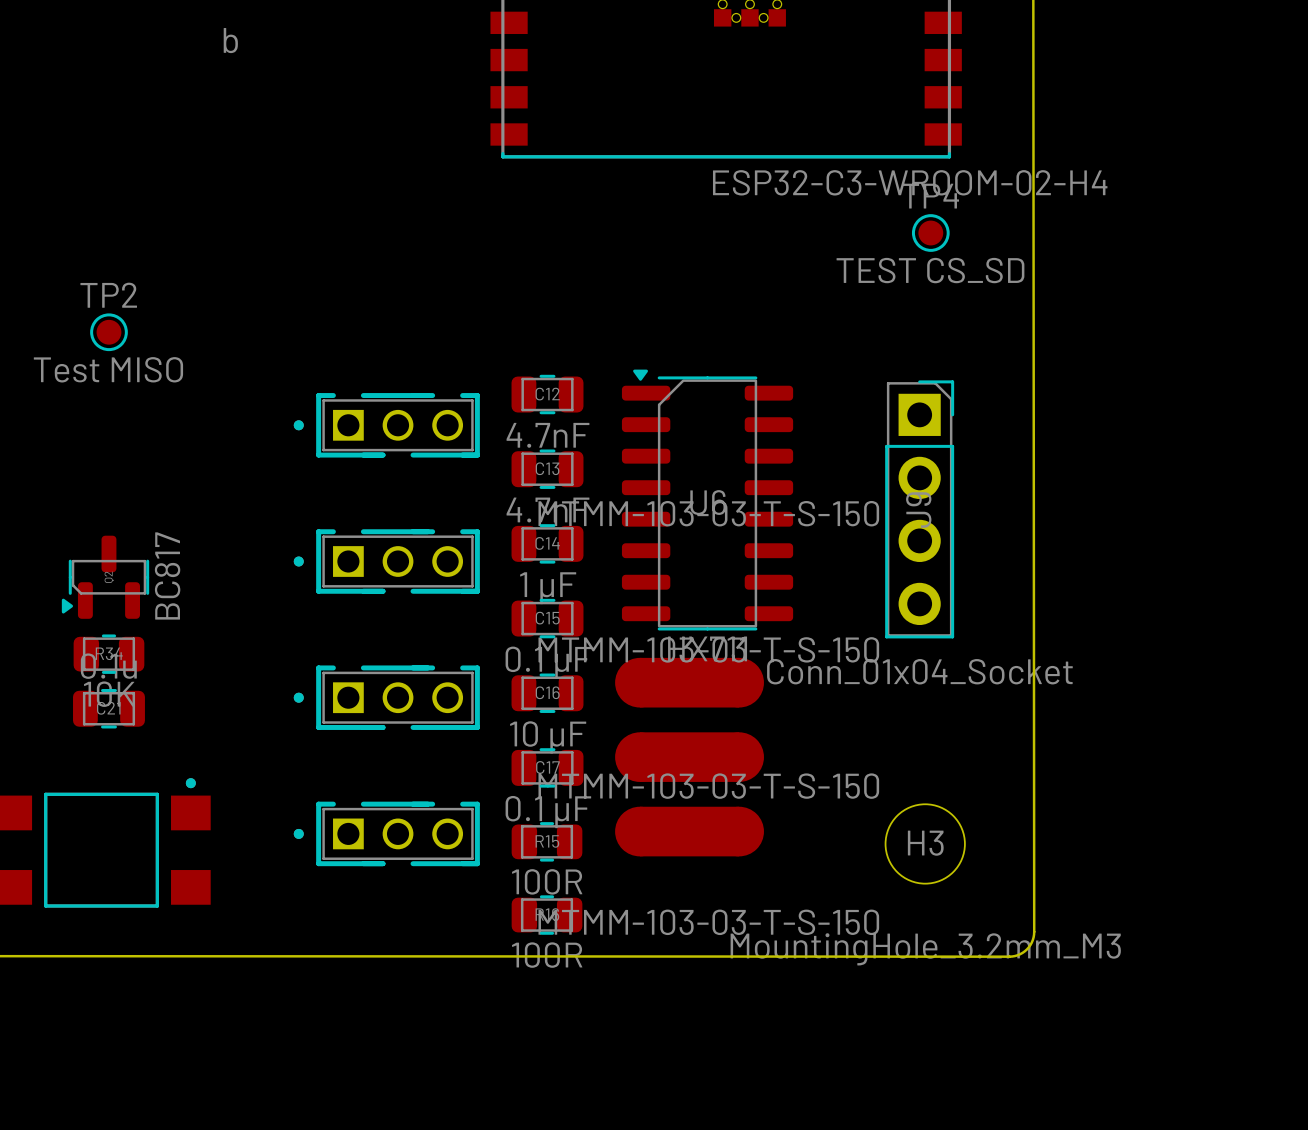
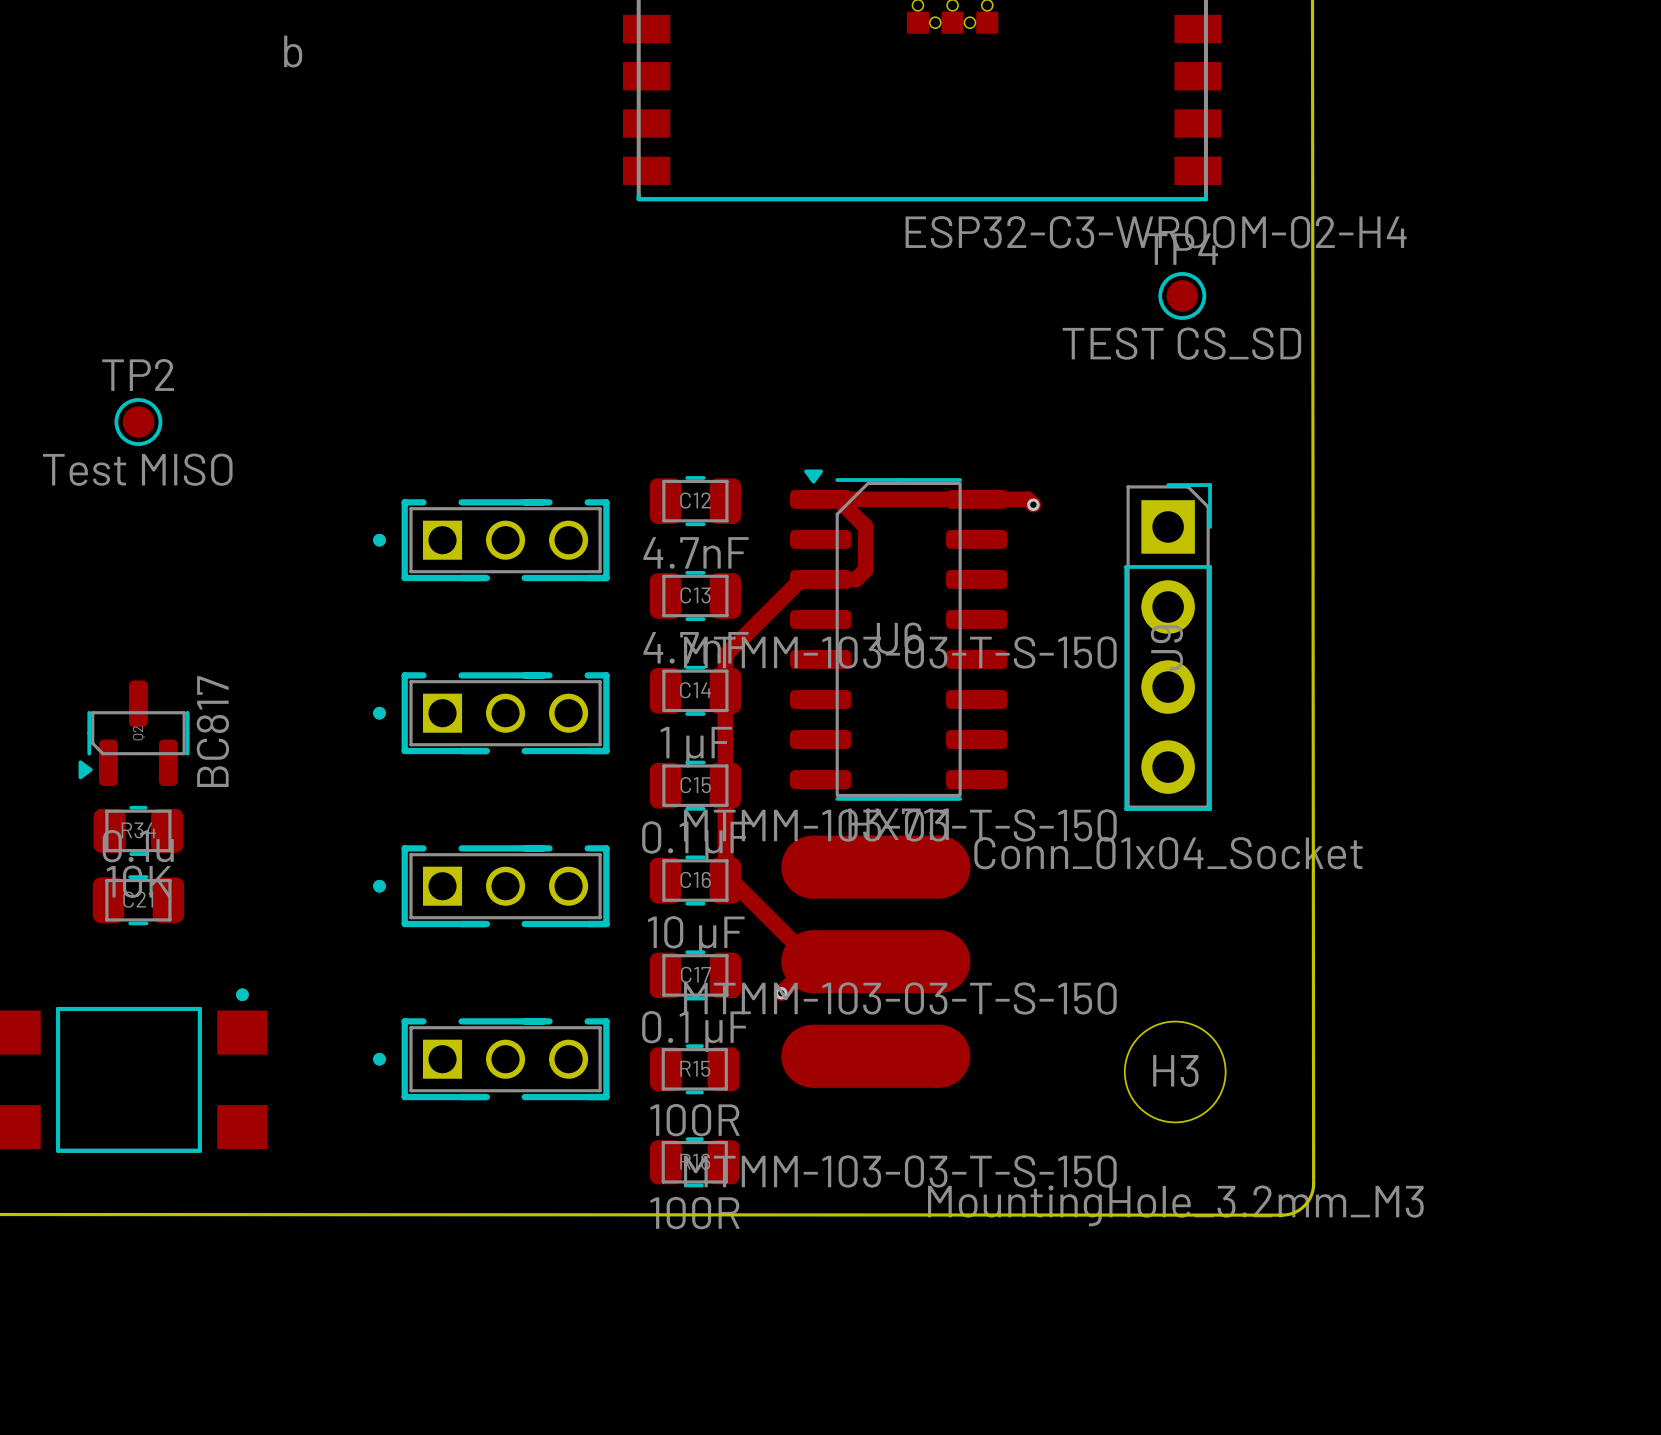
top track: none -> (820, 499) (1028, 499) (1033, 504)
top track: none -> (838, 499) (865, 526) (865, 569) (855, 579) (801, 579) (725, 655) (725, 880) (731, 880) (812, 961) (781, 993)
via: none -> (1033, 504)
via: none -> (781, 993)

